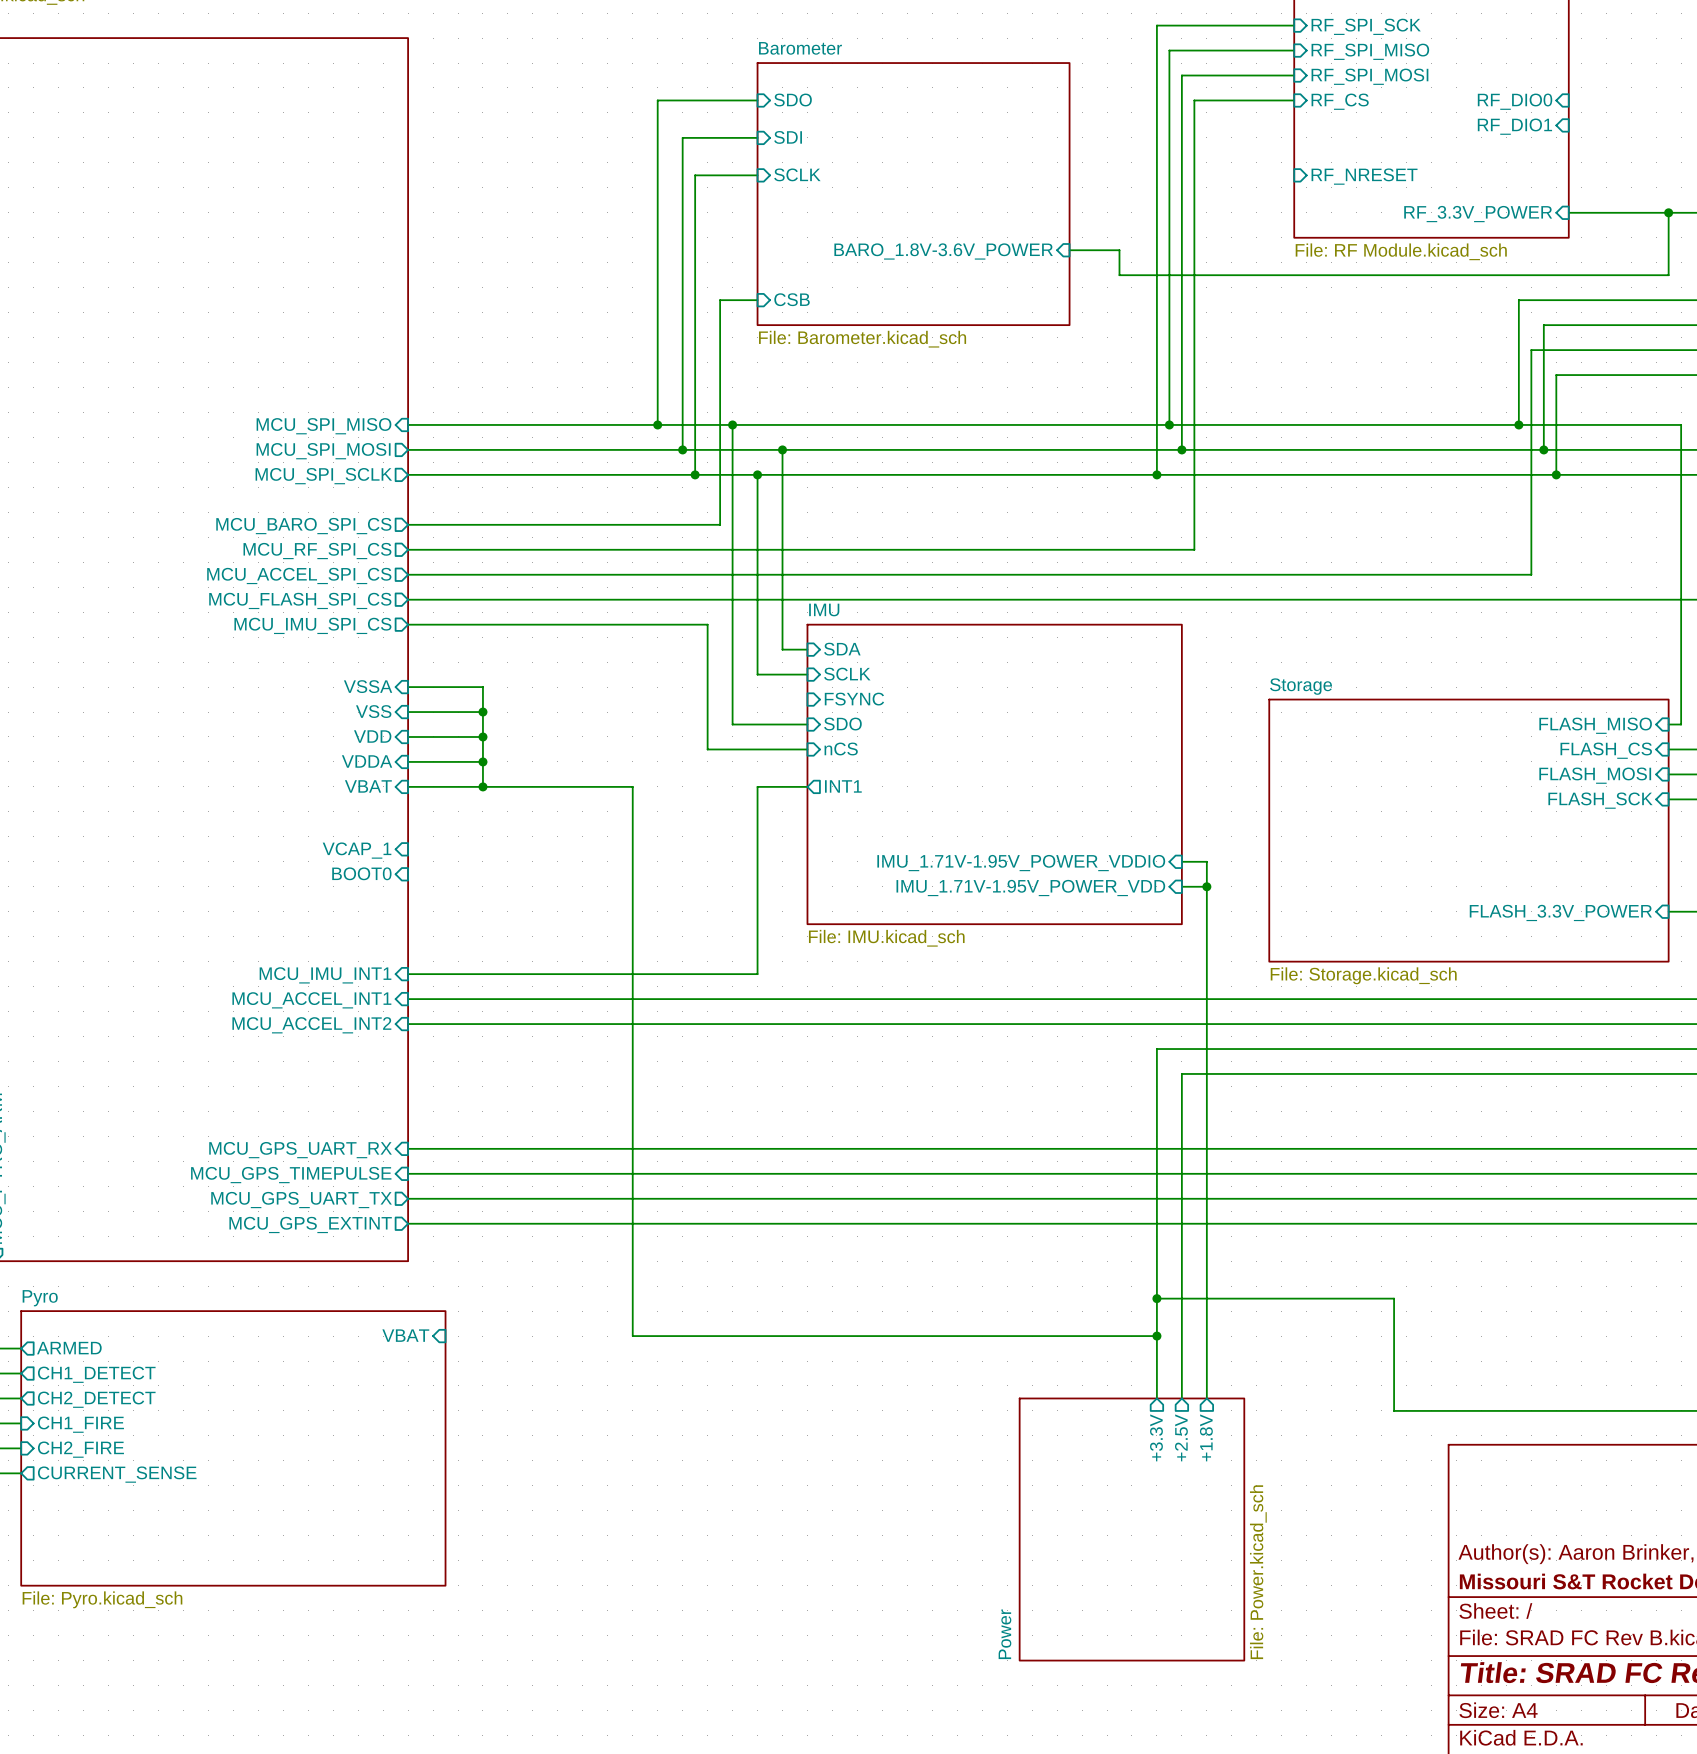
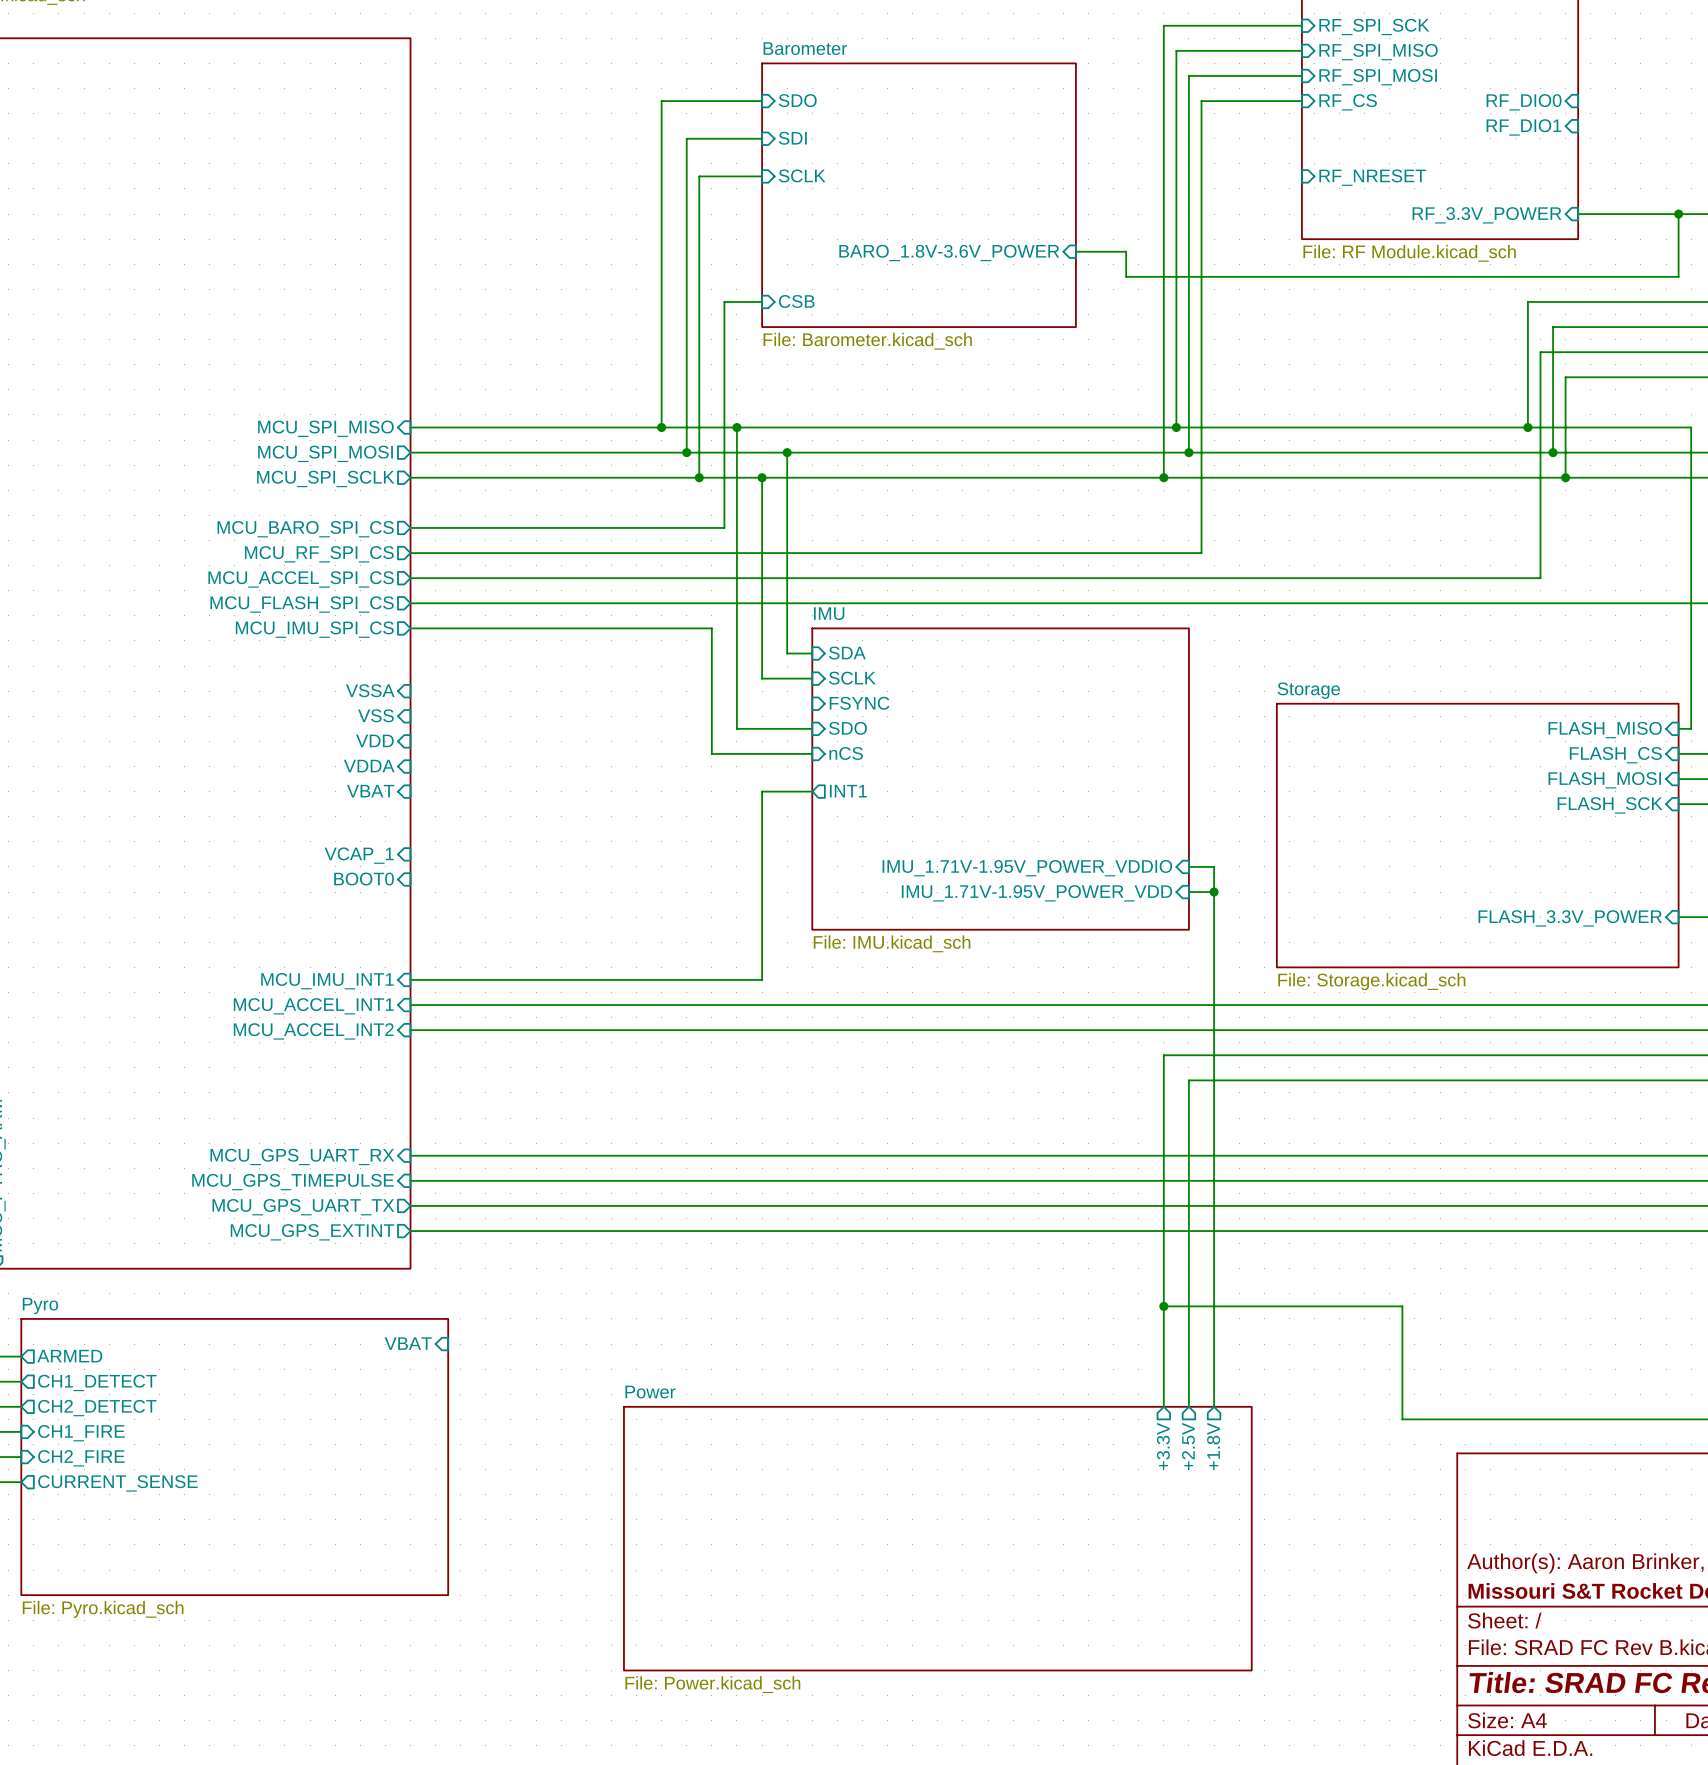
wire: (408, 687) (482, 687) (482, 786) -> none
wire: (408, 712) (482, 712) -> none
junction: (482, 712) -> none
wire: (408, 736) (482, 736) -> none
junction: (482, 736) -> none
wire: (408, 761) (482, 761) -> none
junction: (482, 761) -> none
wire: (408, 786) (632, 786) (632, 1336) (1156, 1336) -> none
junction: (482, 786) -> none
junction: (1156, 1336) -> none
sheet Power: none -> File: Power.kicad_sch (937, 1538)
sheet Power: File: Power.kicad_sch (1131, 1529) -> none

